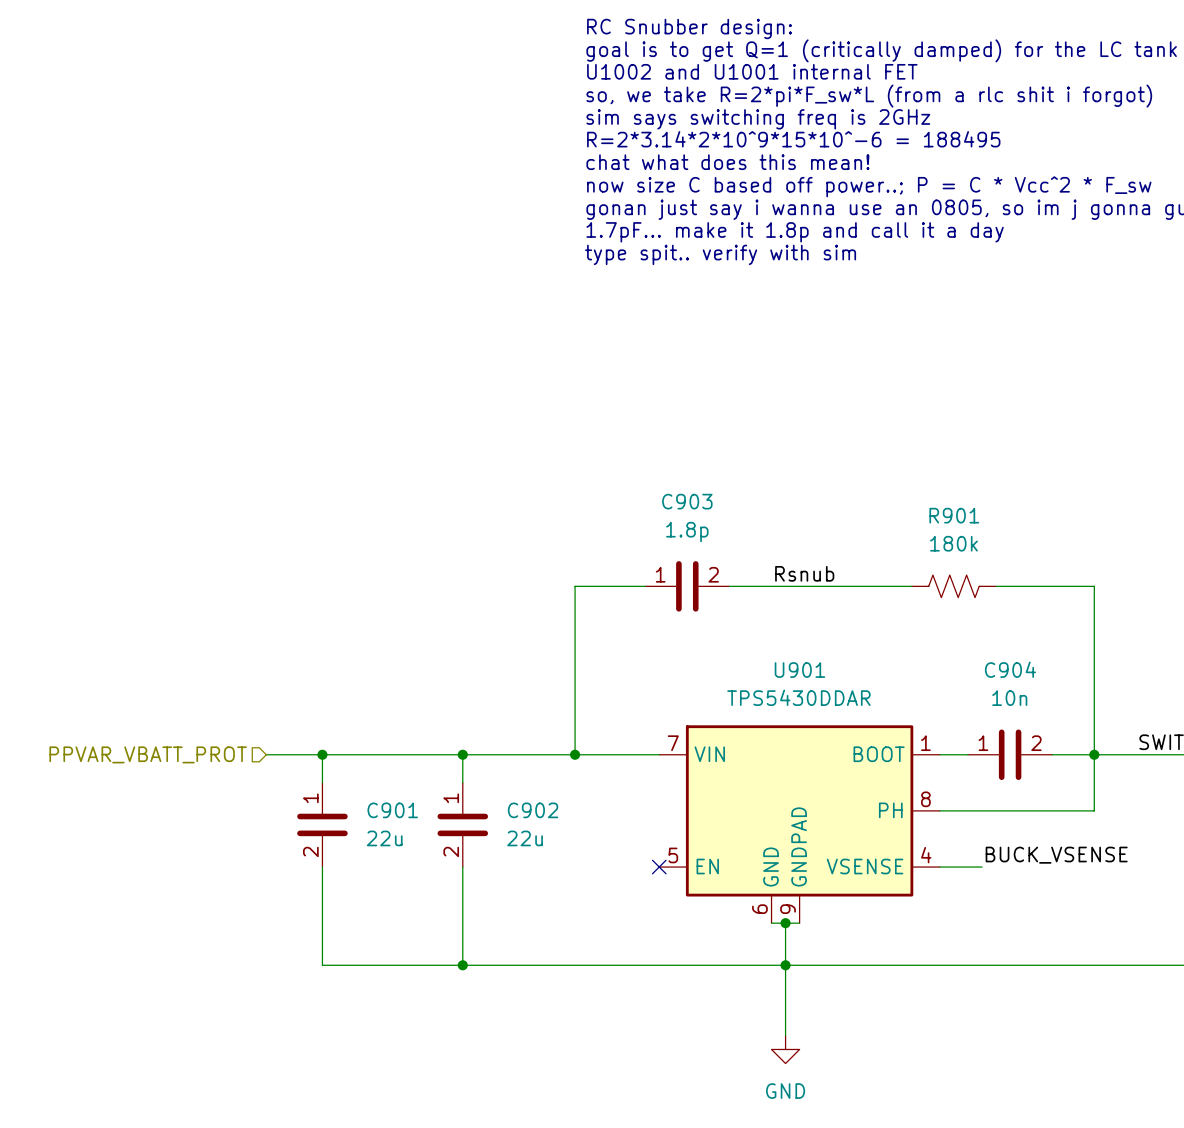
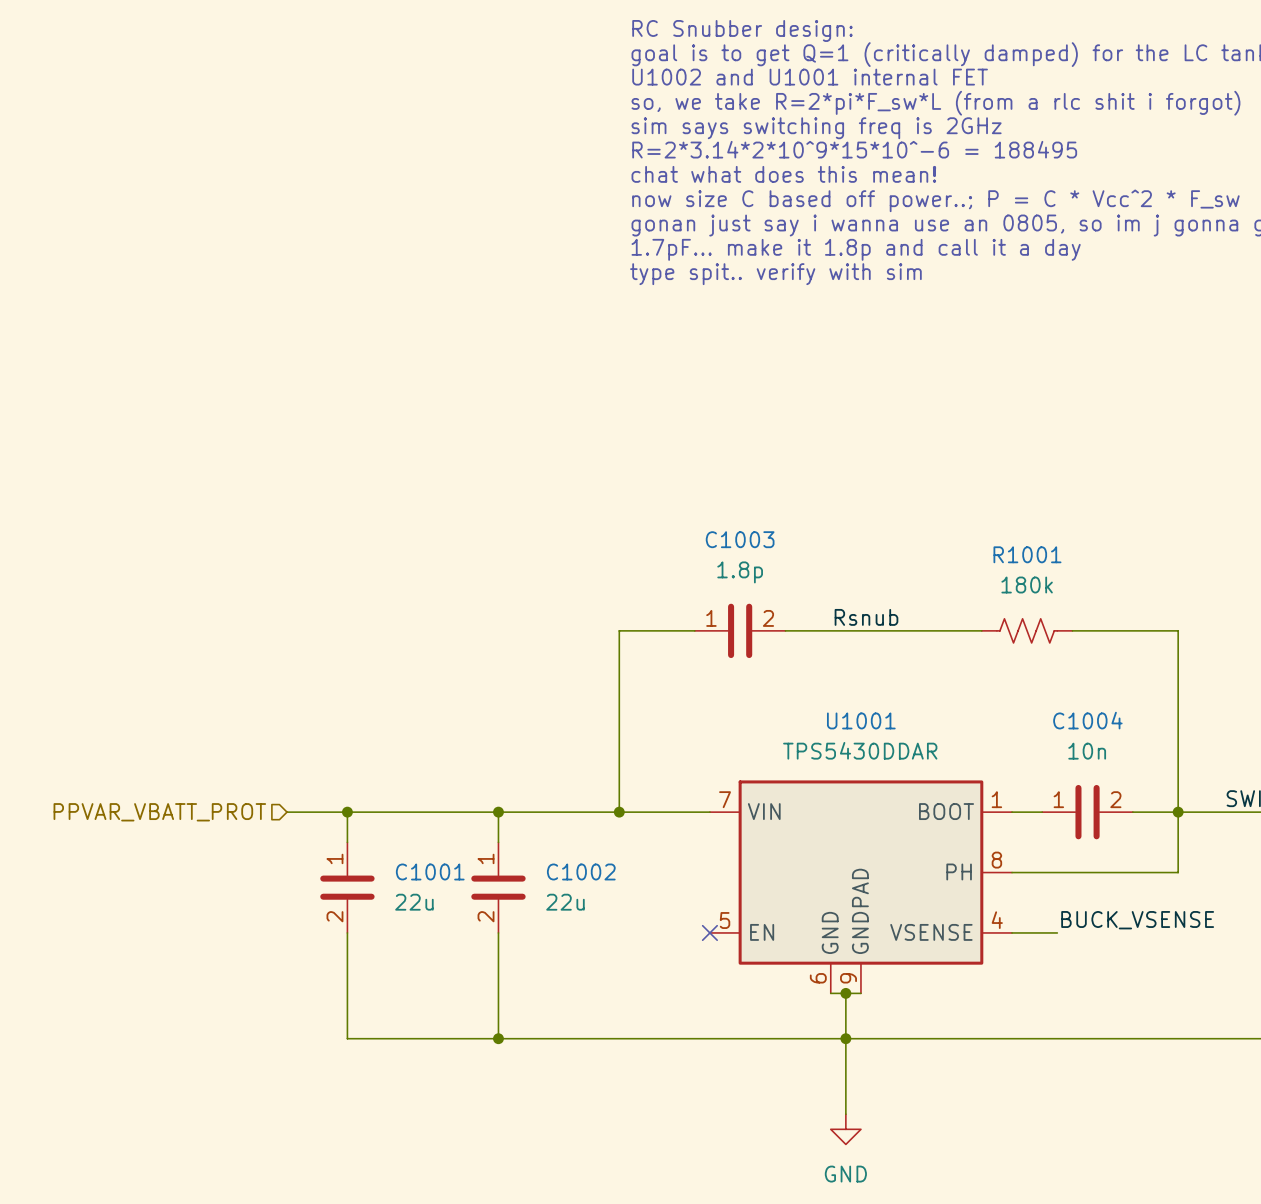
C903 name: C903 (687, 501) -> C1003 (740, 539)
R901 name: R901 (954, 515) -> R1001 (1027, 554)
C904 name: C904 (1010, 669) -> C1004 (1087, 720)
U901 name: U901 (799, 670) -> U1001 (861, 720)
C901 name: C901 (392, 810) -> C1001 (430, 871)
C902 name: C902 (533, 810) -> C1002 (581, 871)

